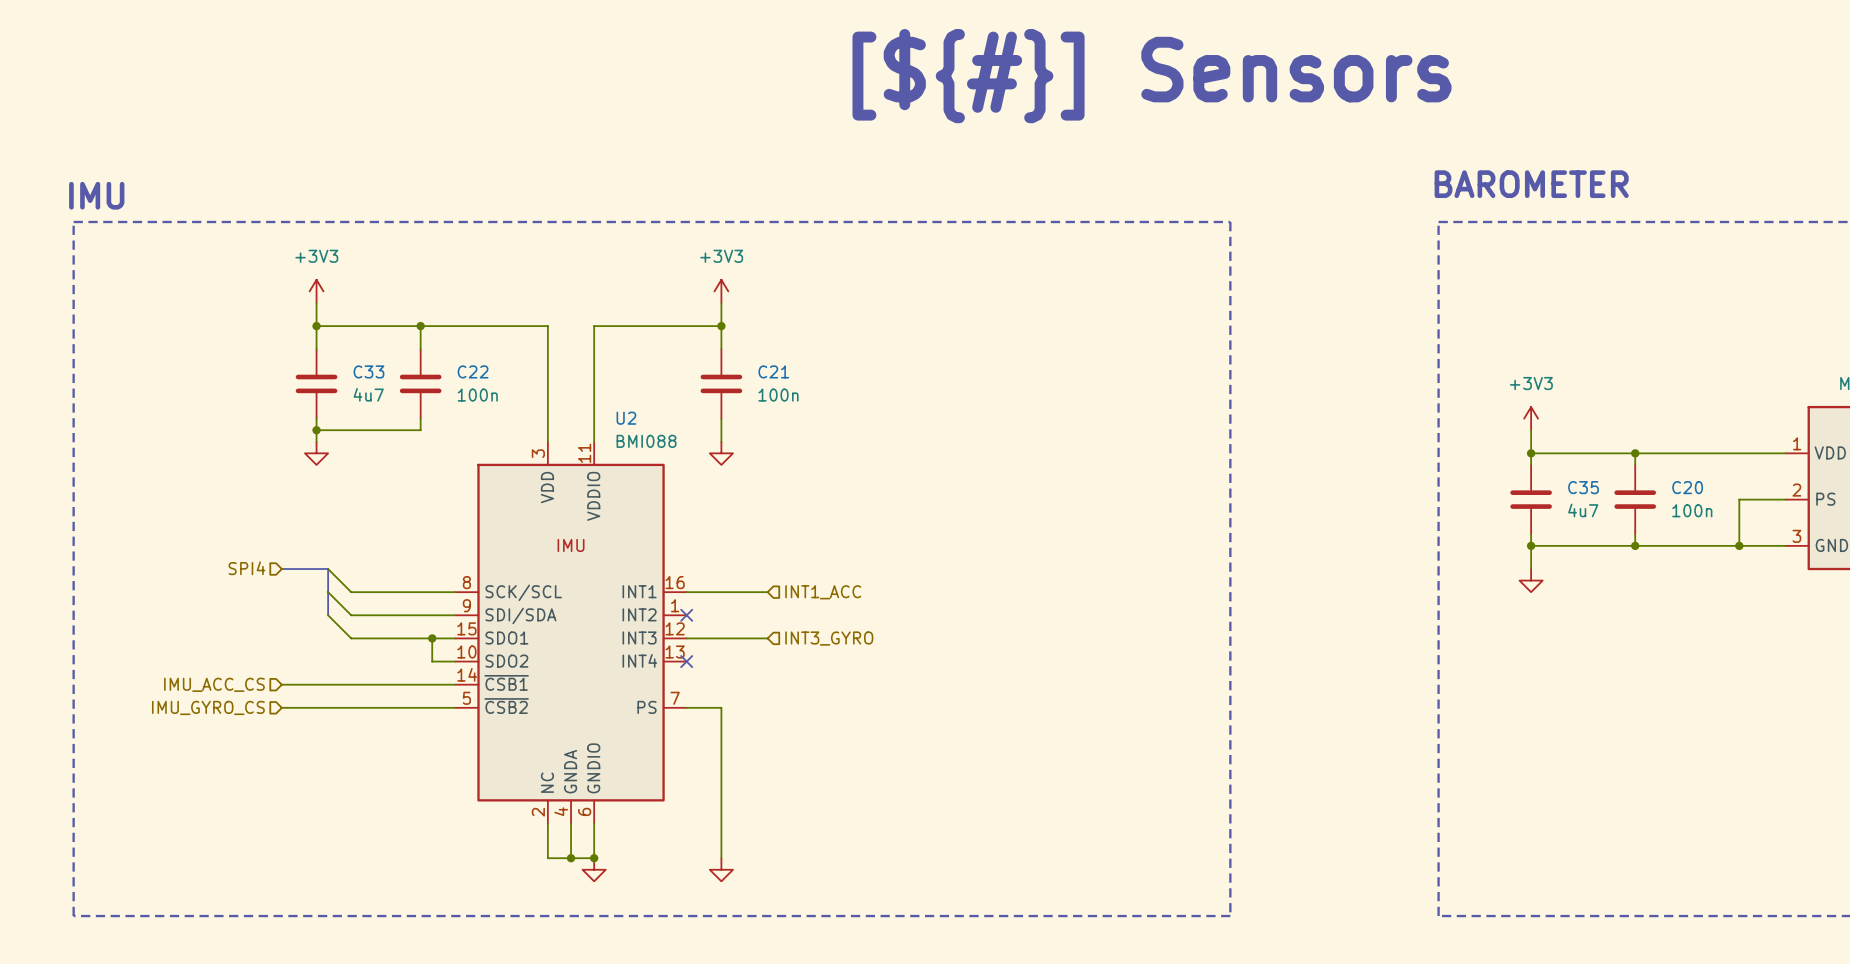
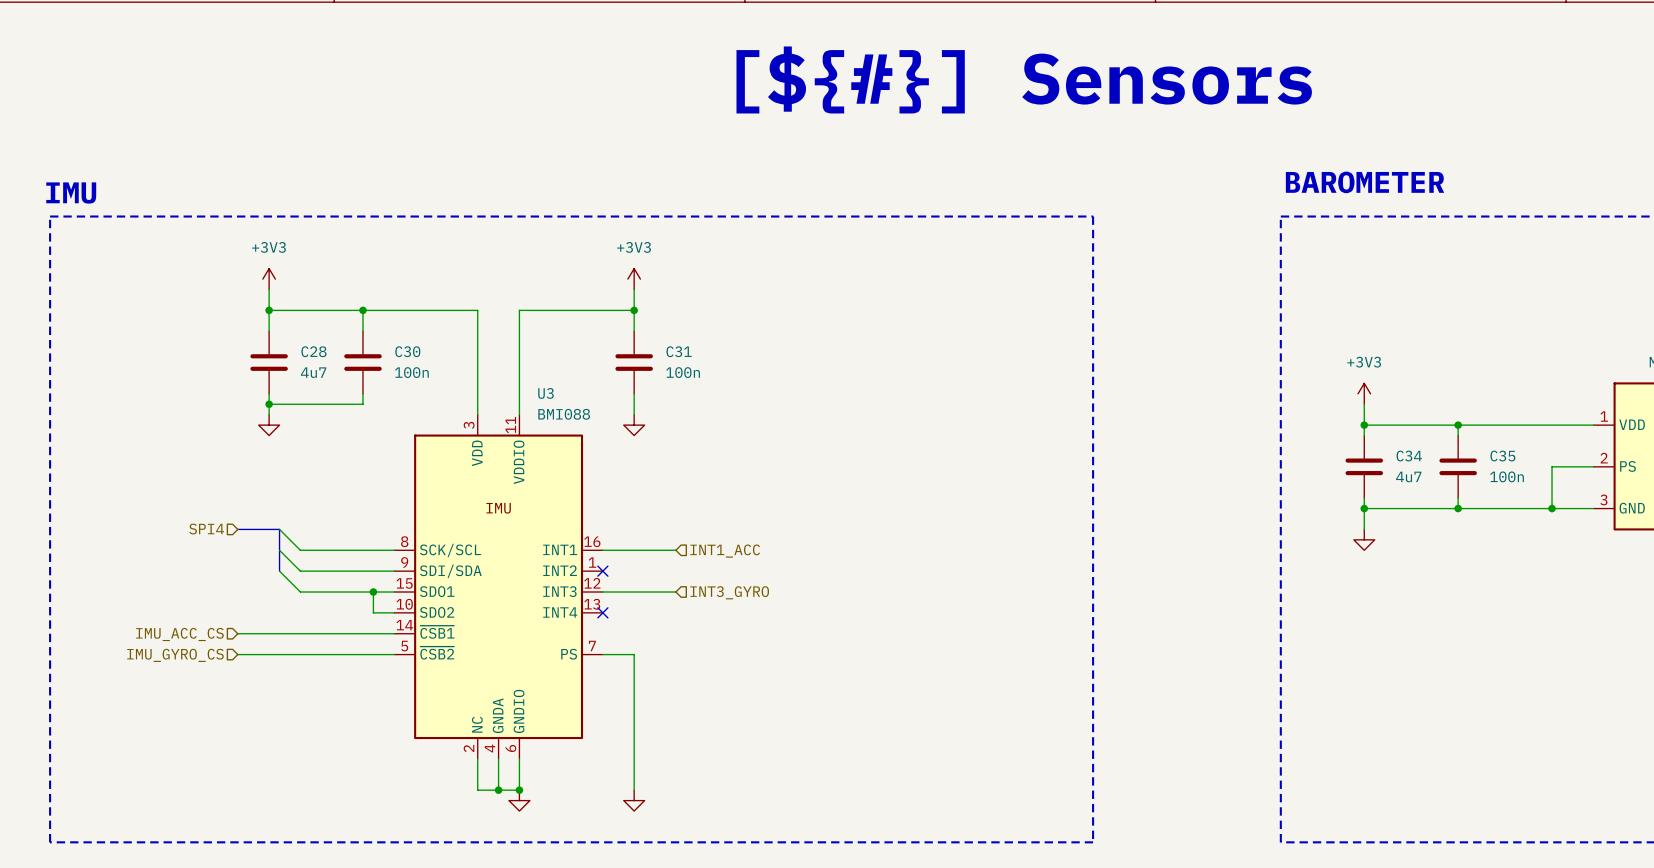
C33 name: C33 (368, 371) -> C28 (313, 351)
C22 name: C22 (473, 371) -> C30 (407, 351)
C21 name: C21 (773, 371) -> C31 (679, 351)
U2 name: U2 (626, 418) -> U3 (545, 393)
C35 name: C35 (1583, 487) -> C34 (1409, 456)
C20 name: C20 (1687, 487) -> C35 (1502, 456)

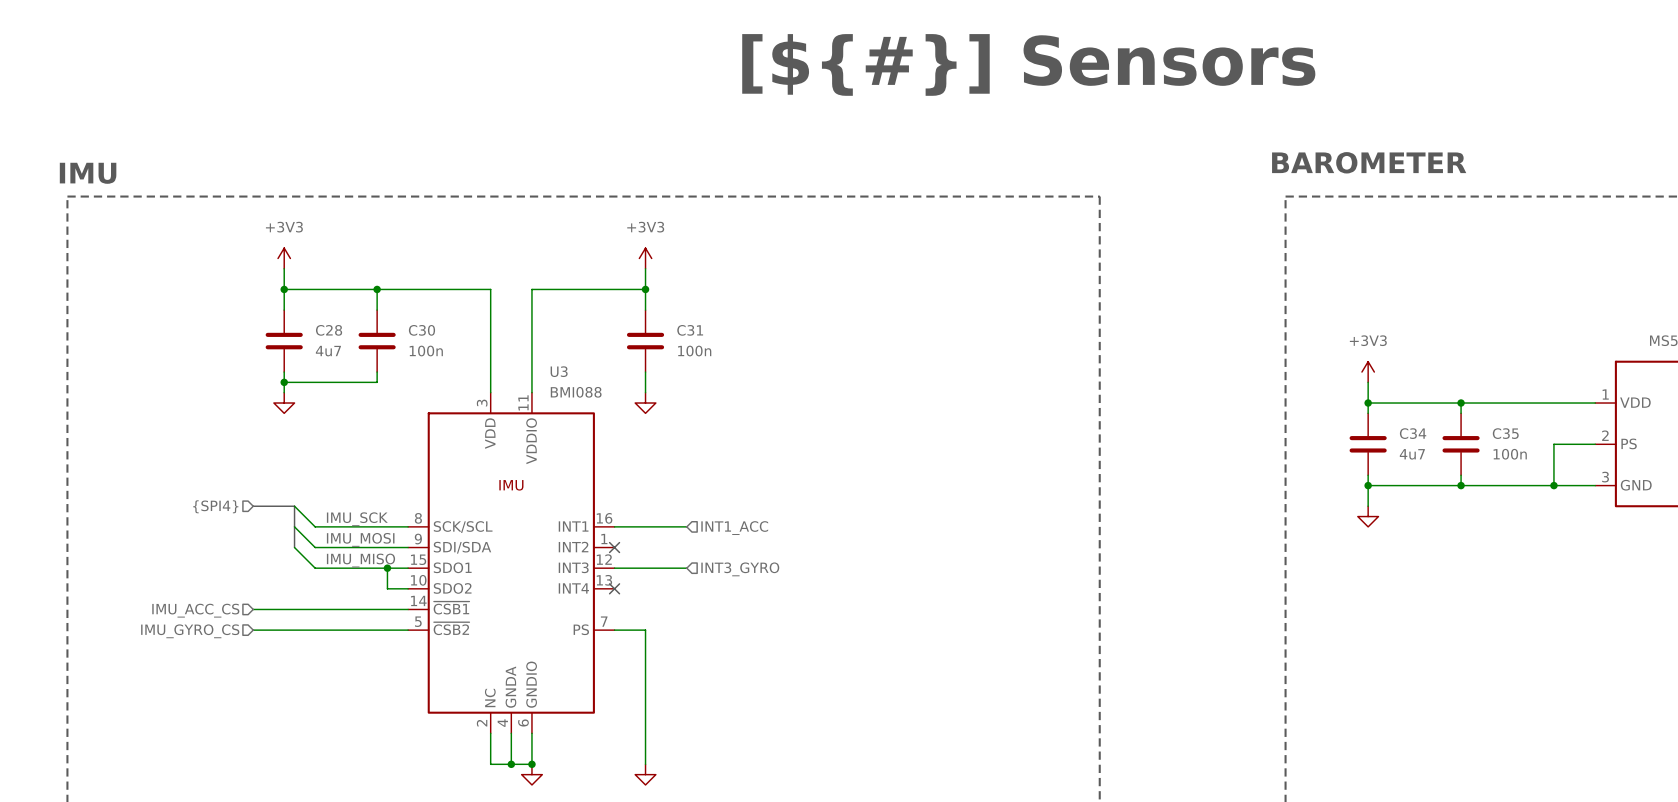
hierarchical label: SPI4 (206, 529) -> {SPI4} (215, 506)
label: none -> IMU_SCK (357, 519)
label: none -> IMU_MOSI (360, 539)
label: none -> IMU_MISO (360, 560)

